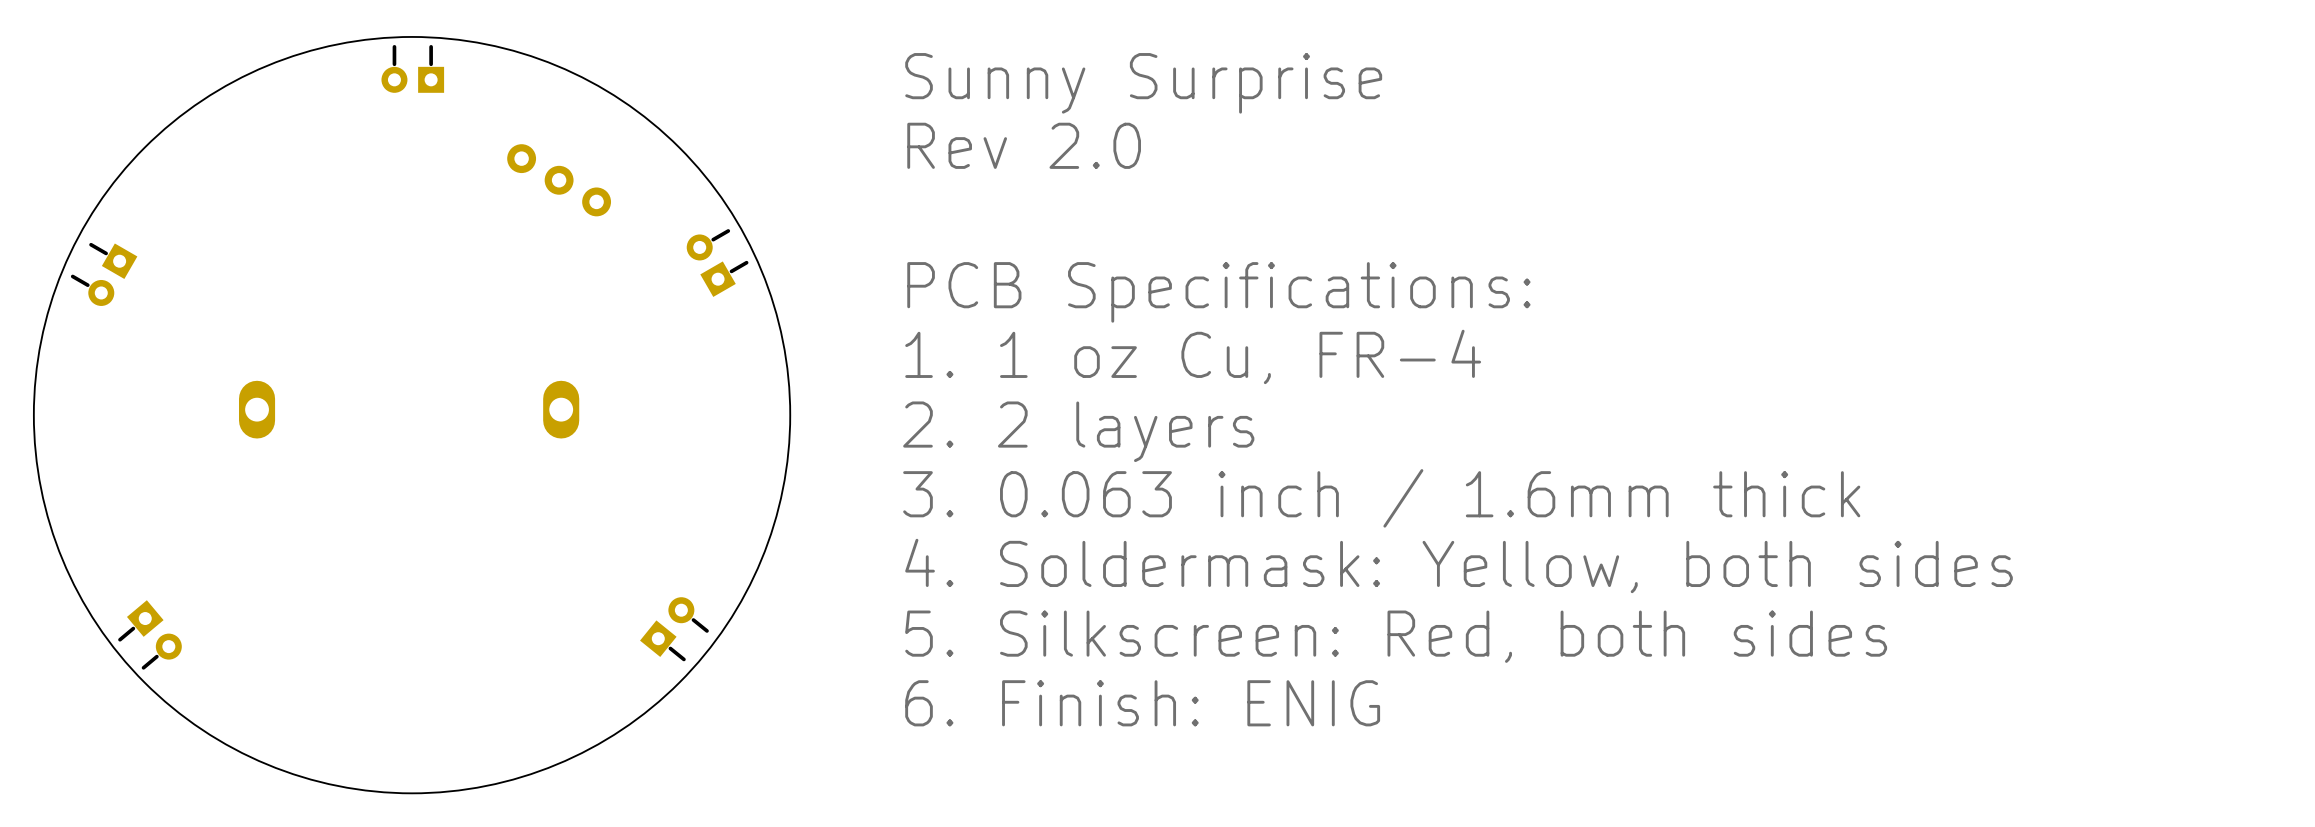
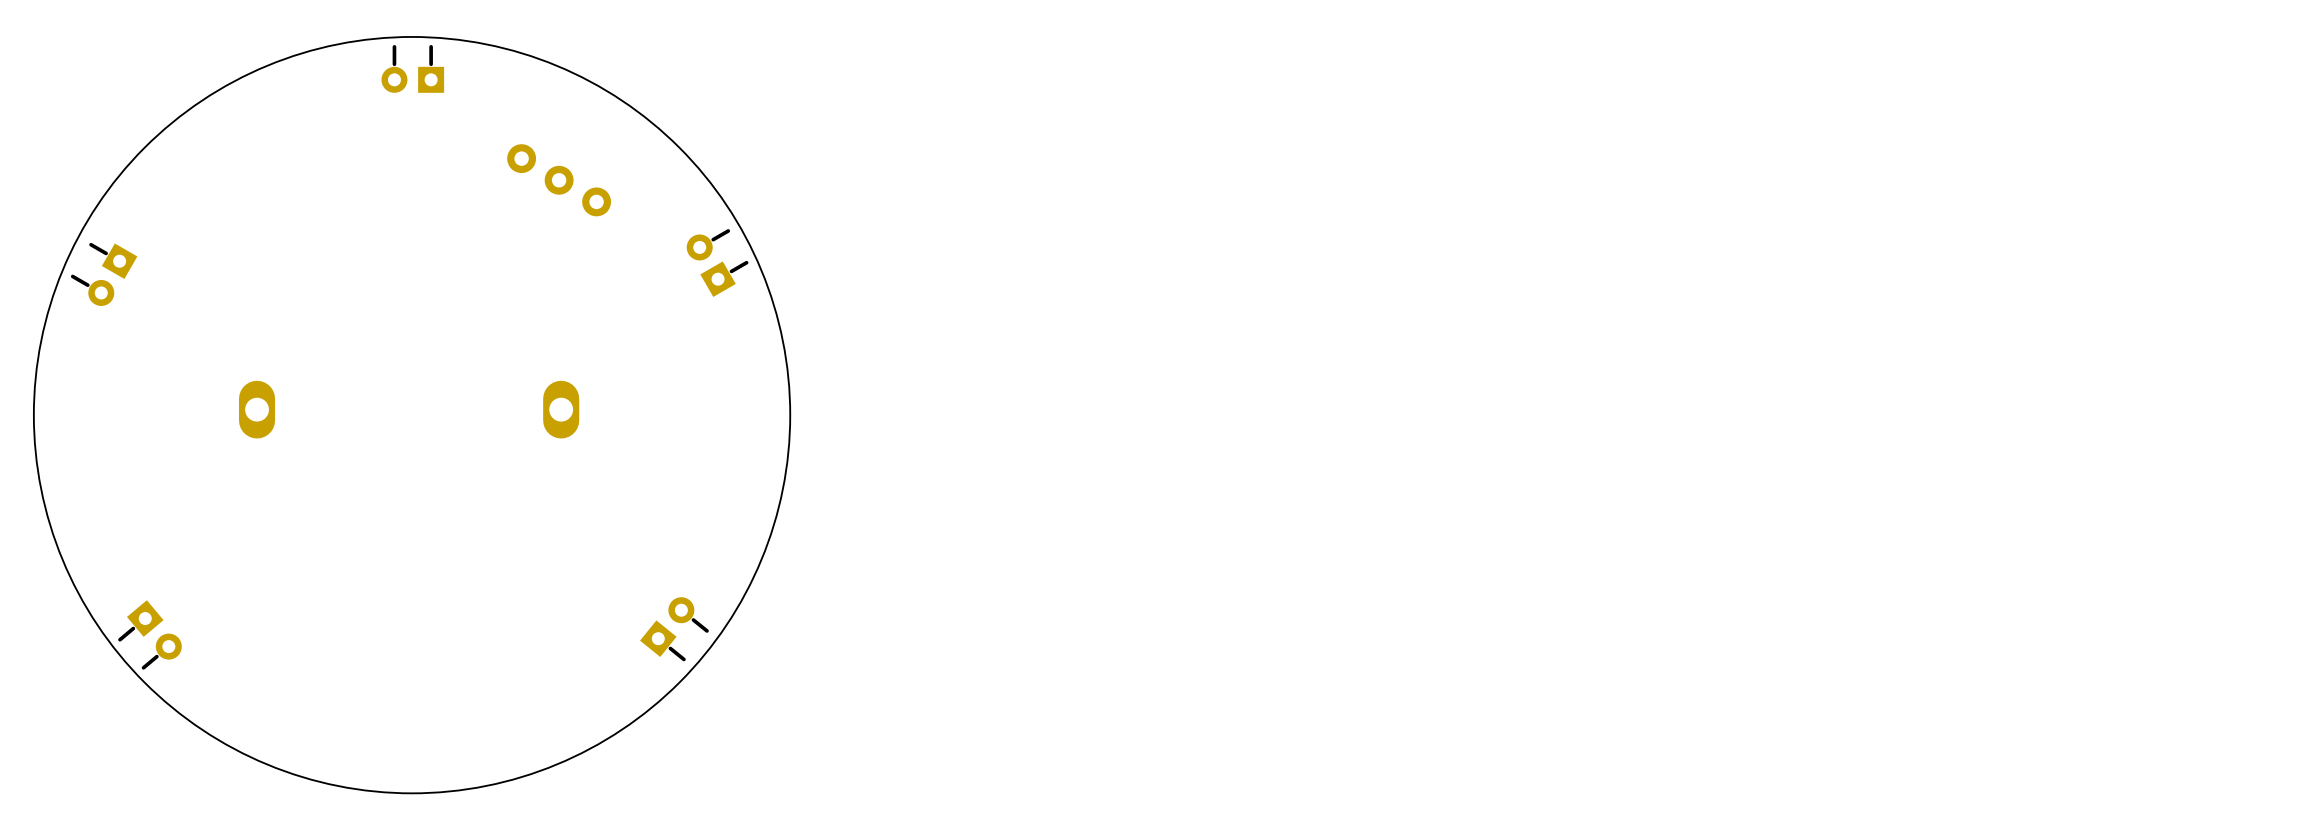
text: Sunny Surprise (1143, 83) -> none
text: Rev 2.0 (1024, 145) -> none
text: PCB Specifications: (1218, 292) -> none
text: 1. 1 oz Cu, FR-4 (1193, 356) -> none
text: 2. 2 layers (1078, 431) -> none
text: 3. 0.063 inch / 1.6mm thick (1381, 498) -> none
text: 4. Soldermask: Yellow, both sides (1459, 565) -> none
text: 5. Silkscreen: Red, both sides (1396, 636) -> none
text: 6. Finish: ENIG (1142, 703) -> none

